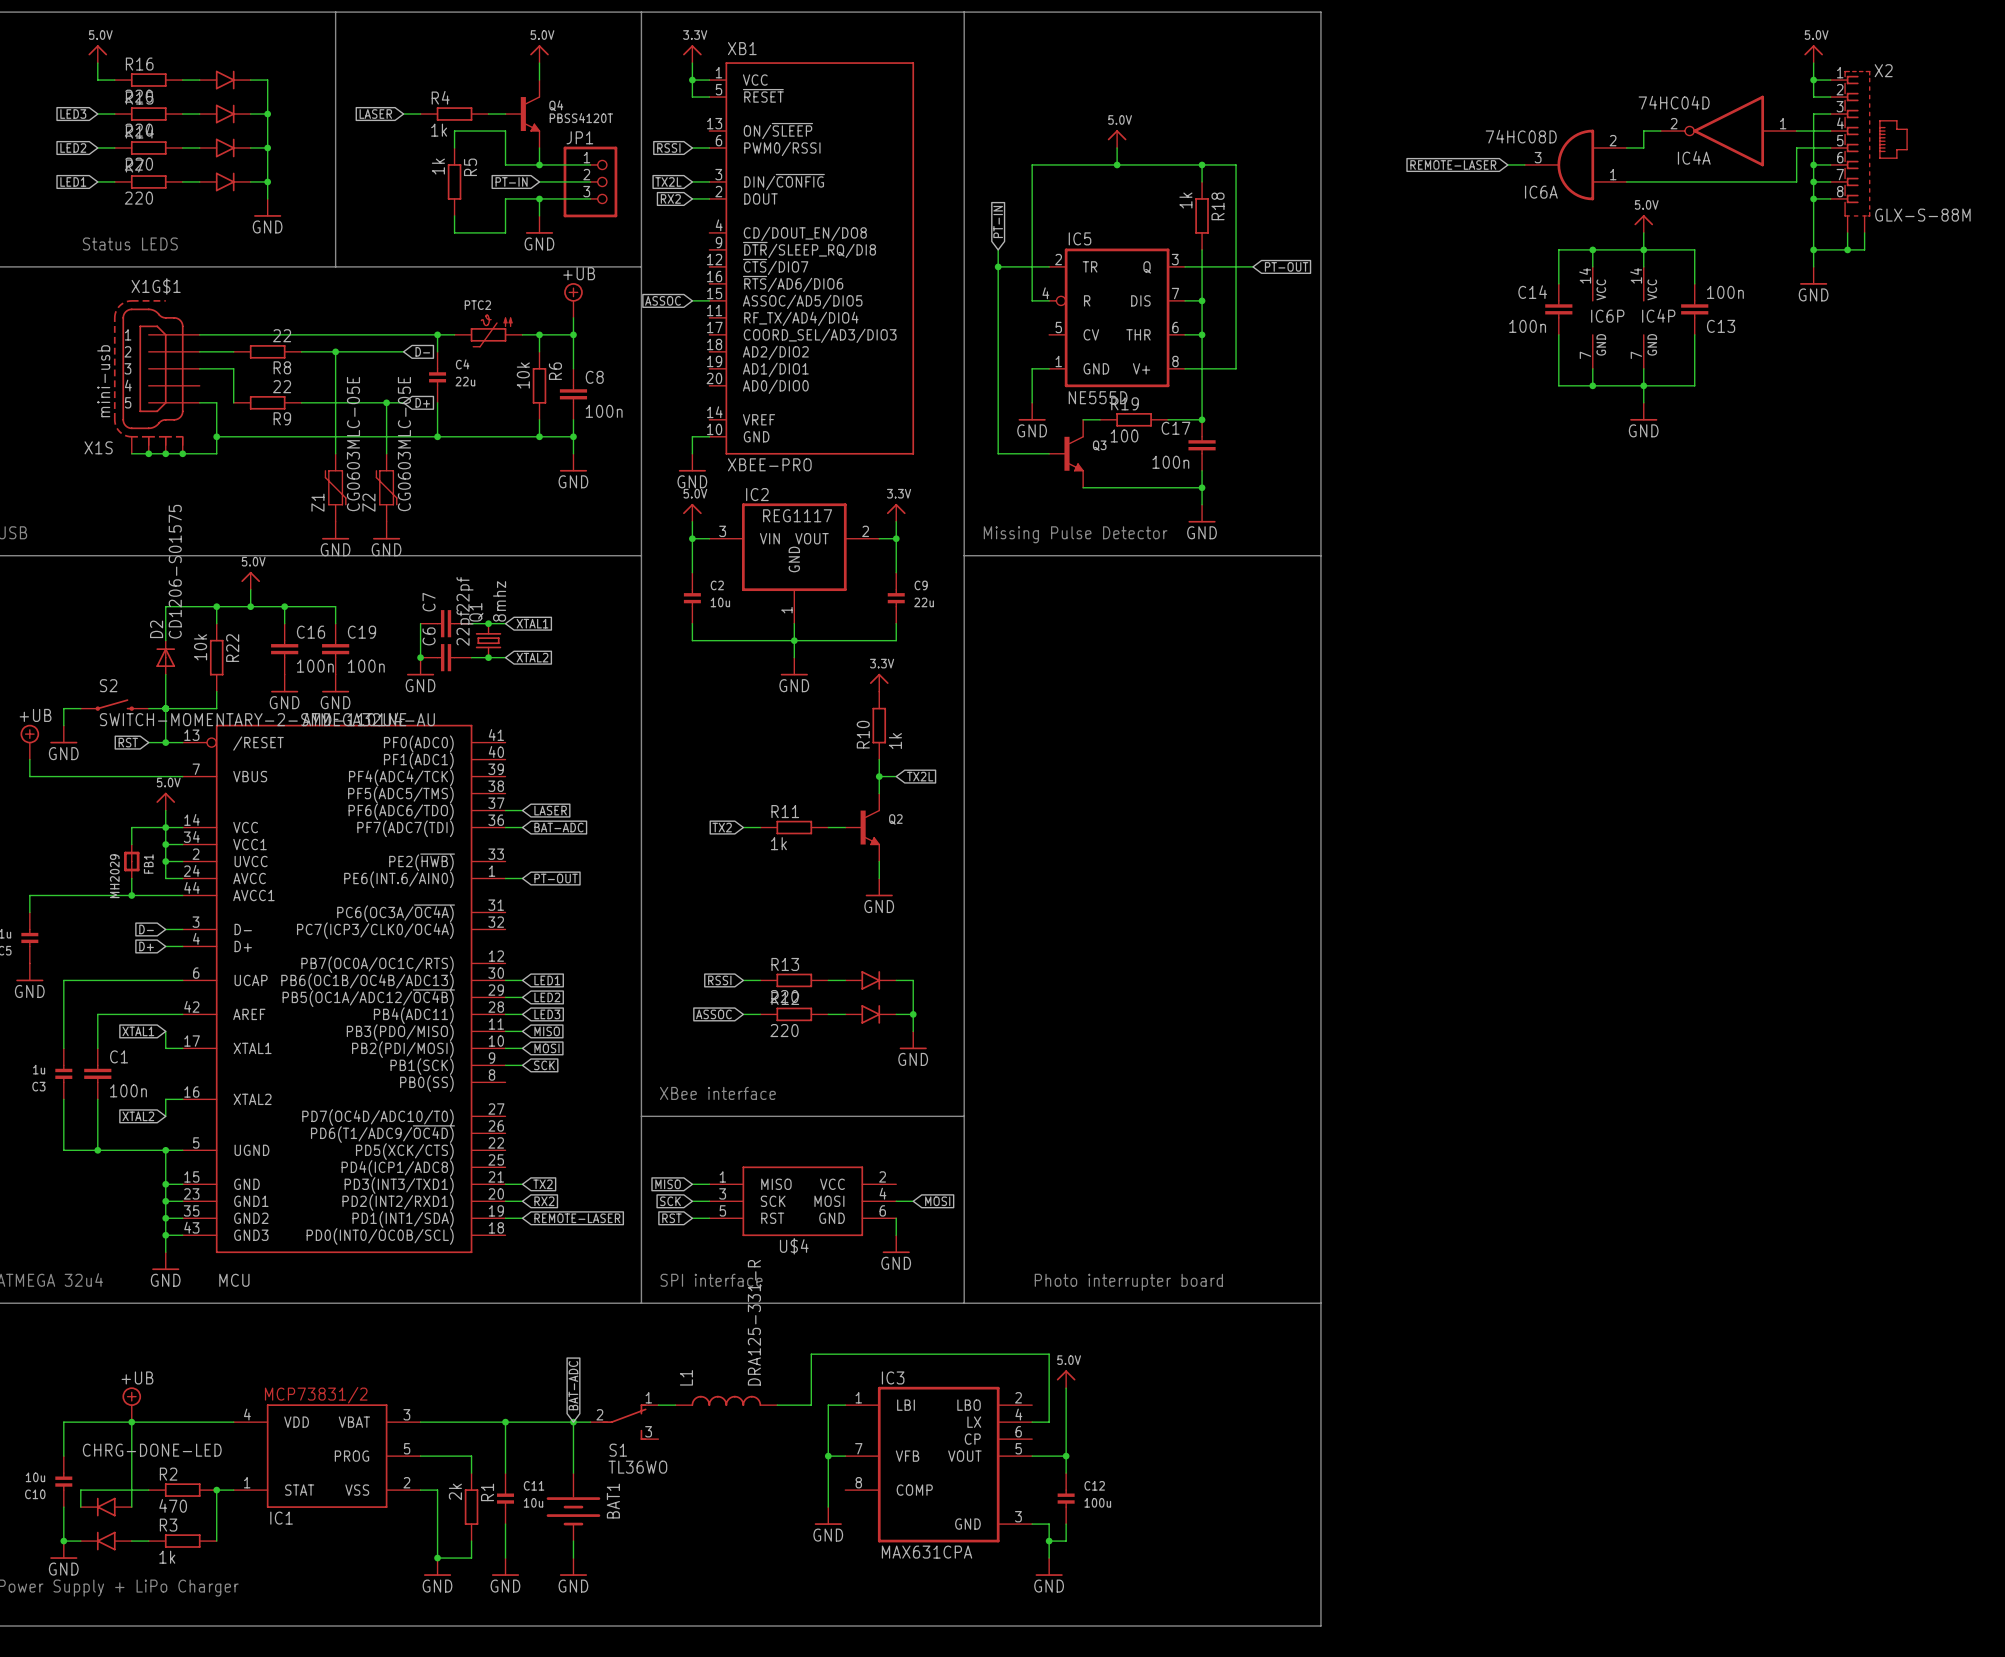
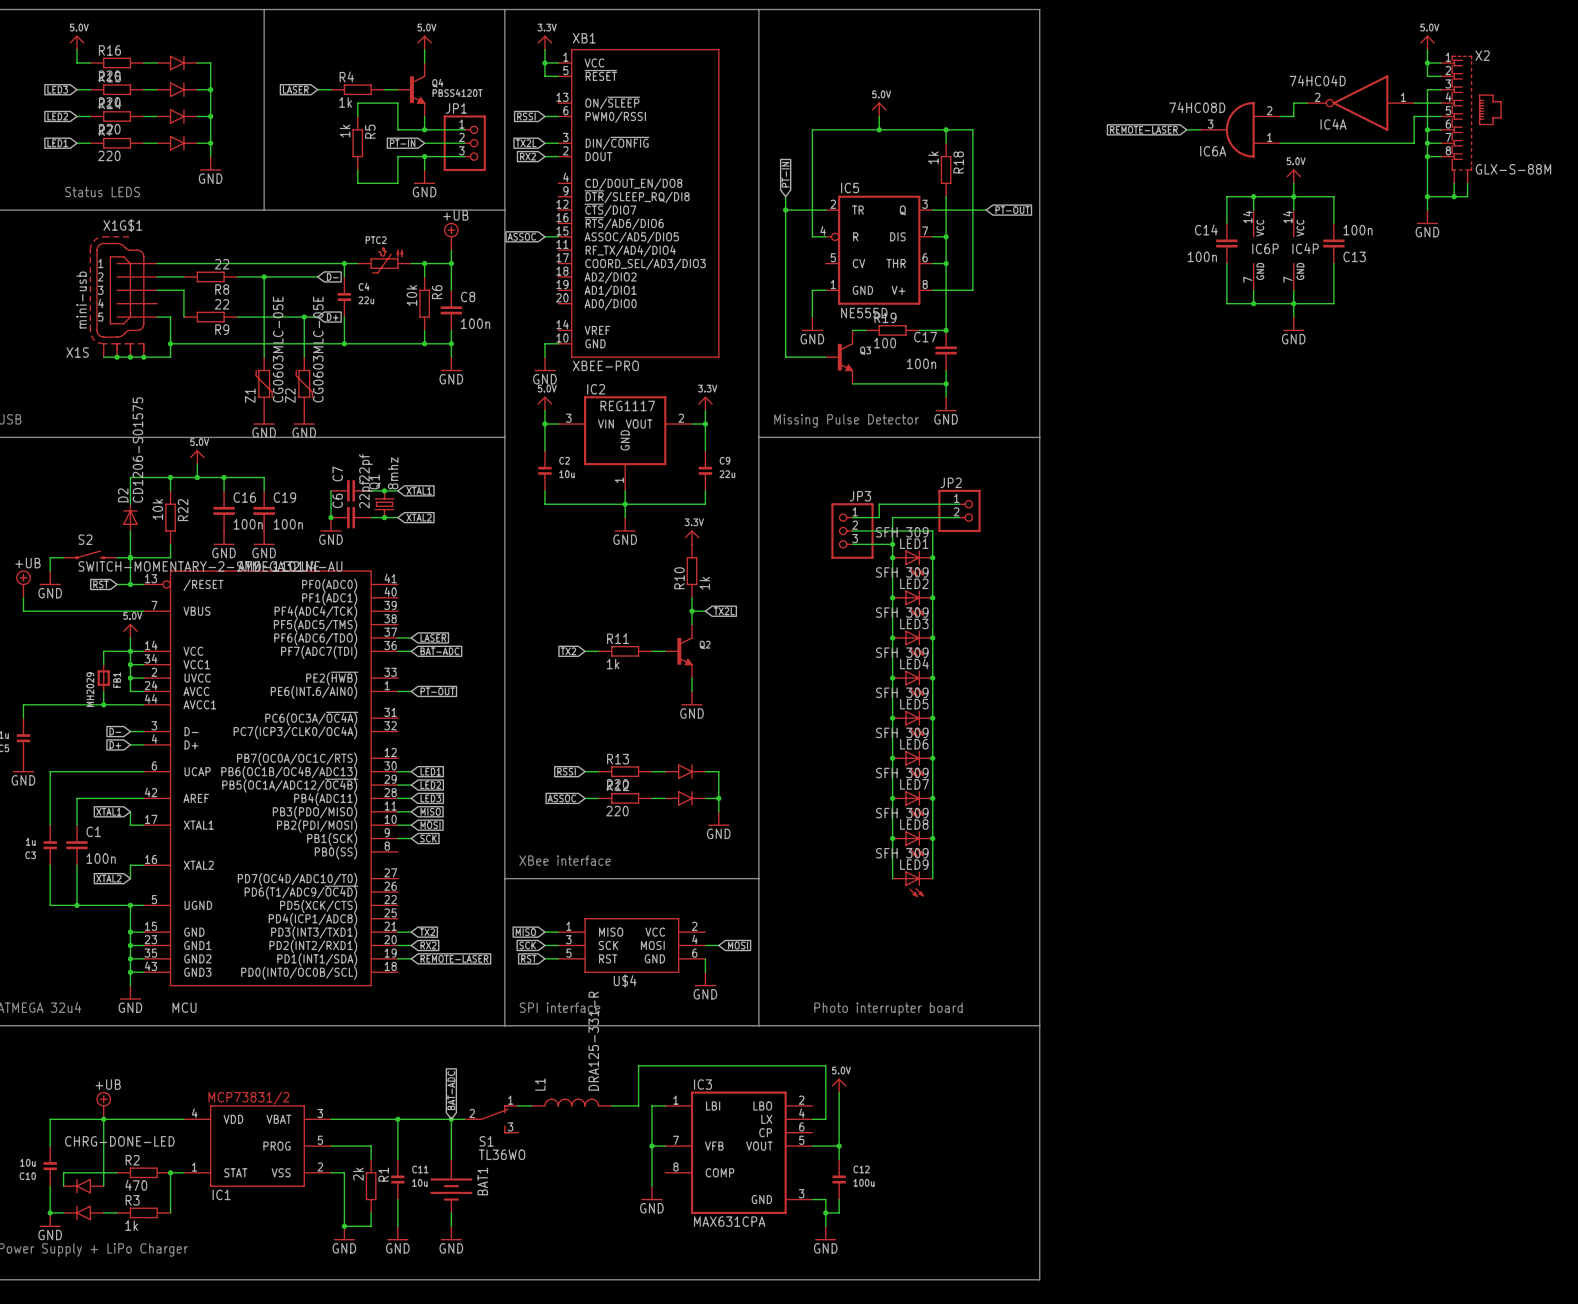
wire: none -> (959, 504) (879, 504) (879, 517) (852, 517)
JP2: none -> (959, 510)
wire: none -> (959, 517) (892, 517) (892, 878)
wire: none -> (852, 530) (932, 530) (932, 878)
JP3: none -> (852, 530)
wire: none -> (852, 544) (892, 544)
junction: none -> (892, 544)
junction: none -> (892, 557)
junction: none -> (932, 557)
LED1: none -> SFH 309 (912, 563)
junction: none -> (892, 597)
junction: none -> (932, 597)
LED2: none -> SFH 309 (912, 603)
junction: none -> (892, 637)
junction: none -> (932, 637)
LED3: none -> SFH 309 (912, 643)
junction: none -> (892, 678)
junction: none -> (932, 678)
LED4: none -> SFH 309 (912, 683)
junction: none -> (892, 718)
junction: none -> (932, 718)
LED5: none -> SFH 309 (912, 723)
junction: none -> (892, 758)
junction: none -> (932, 758)
LED6: none -> SFH 309 (912, 763)
junction: none -> (892, 798)
junction: none -> (932, 798)
LED7: none -> SFH 309 (912, 803)
junction: none -> (892, 838)
junction: none -> (932, 838)
LED8: none -> SFH 309 (912, 844)
LED9: none -> SFH 309 (912, 884)

